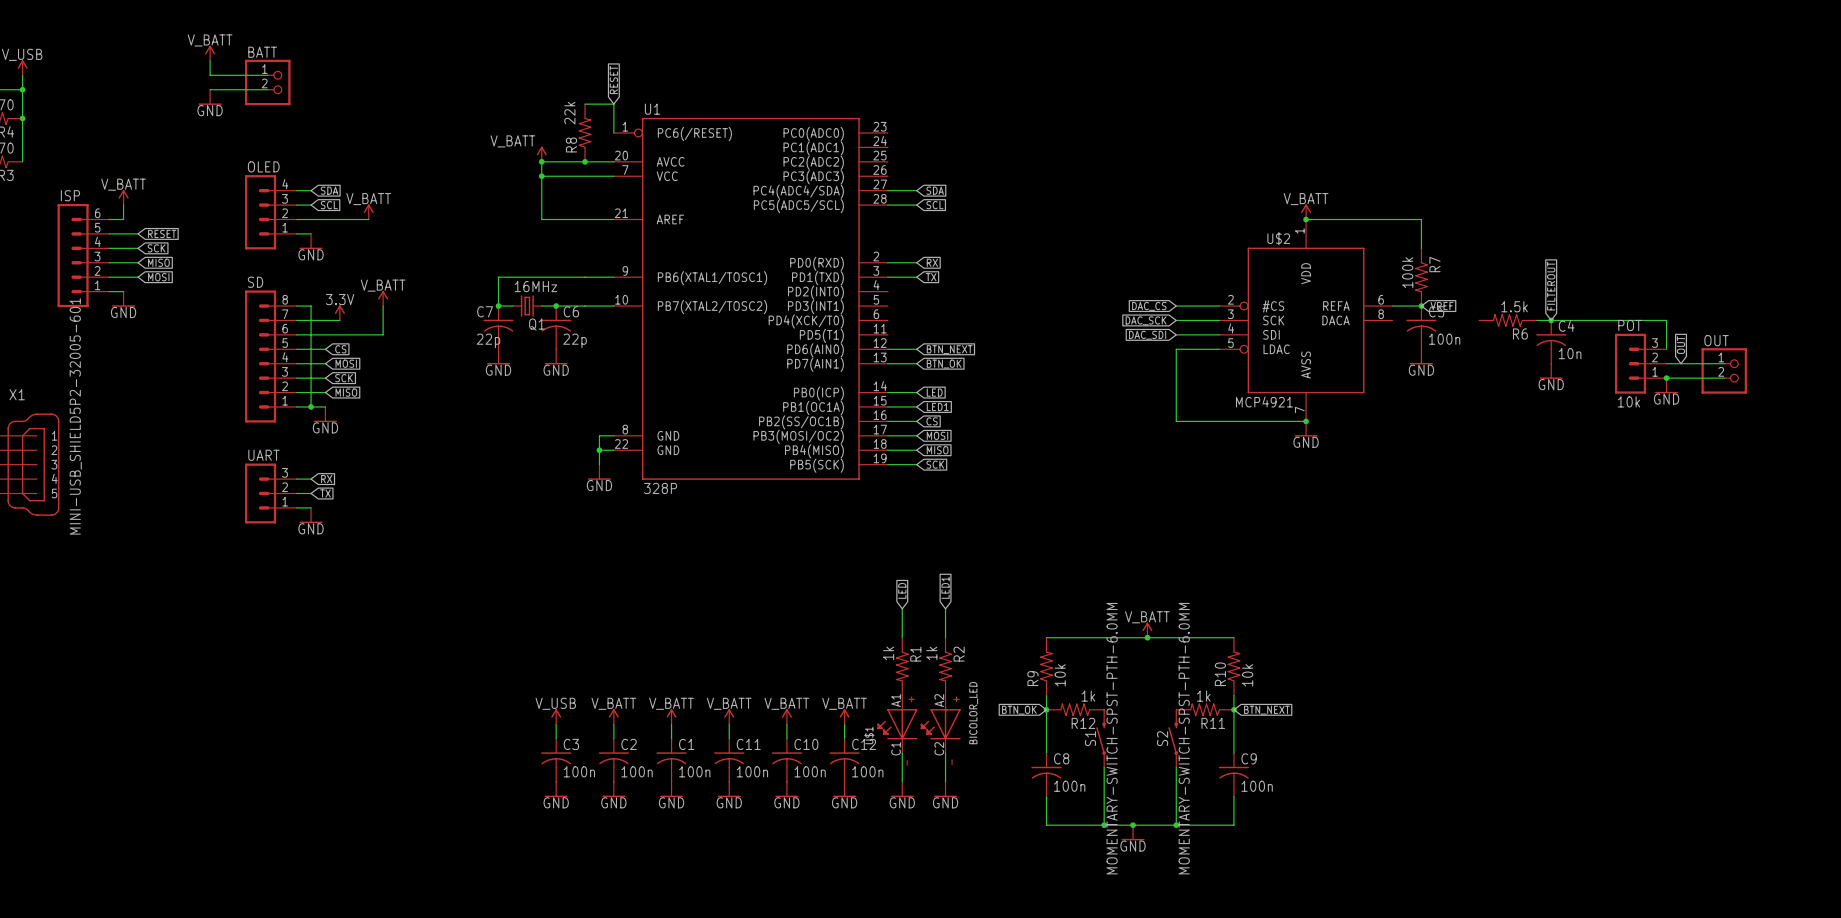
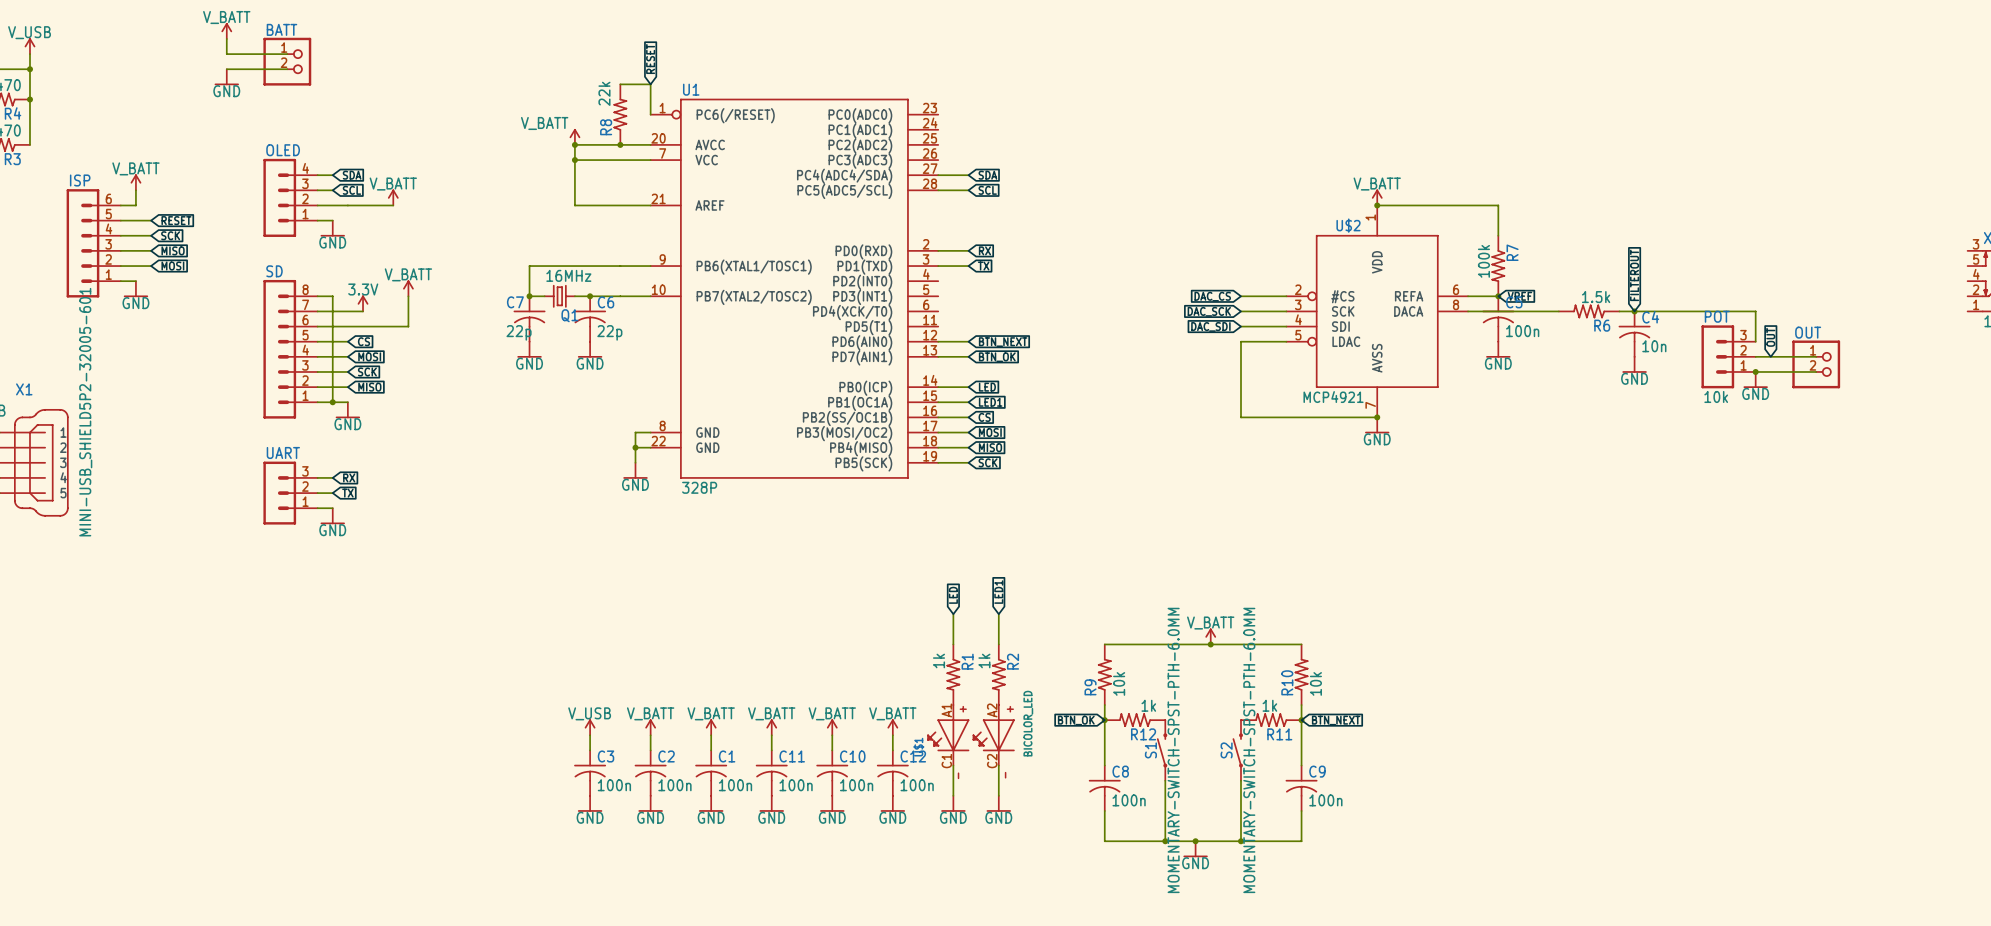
wire: none -> (1468, 311) (1558, 311)

